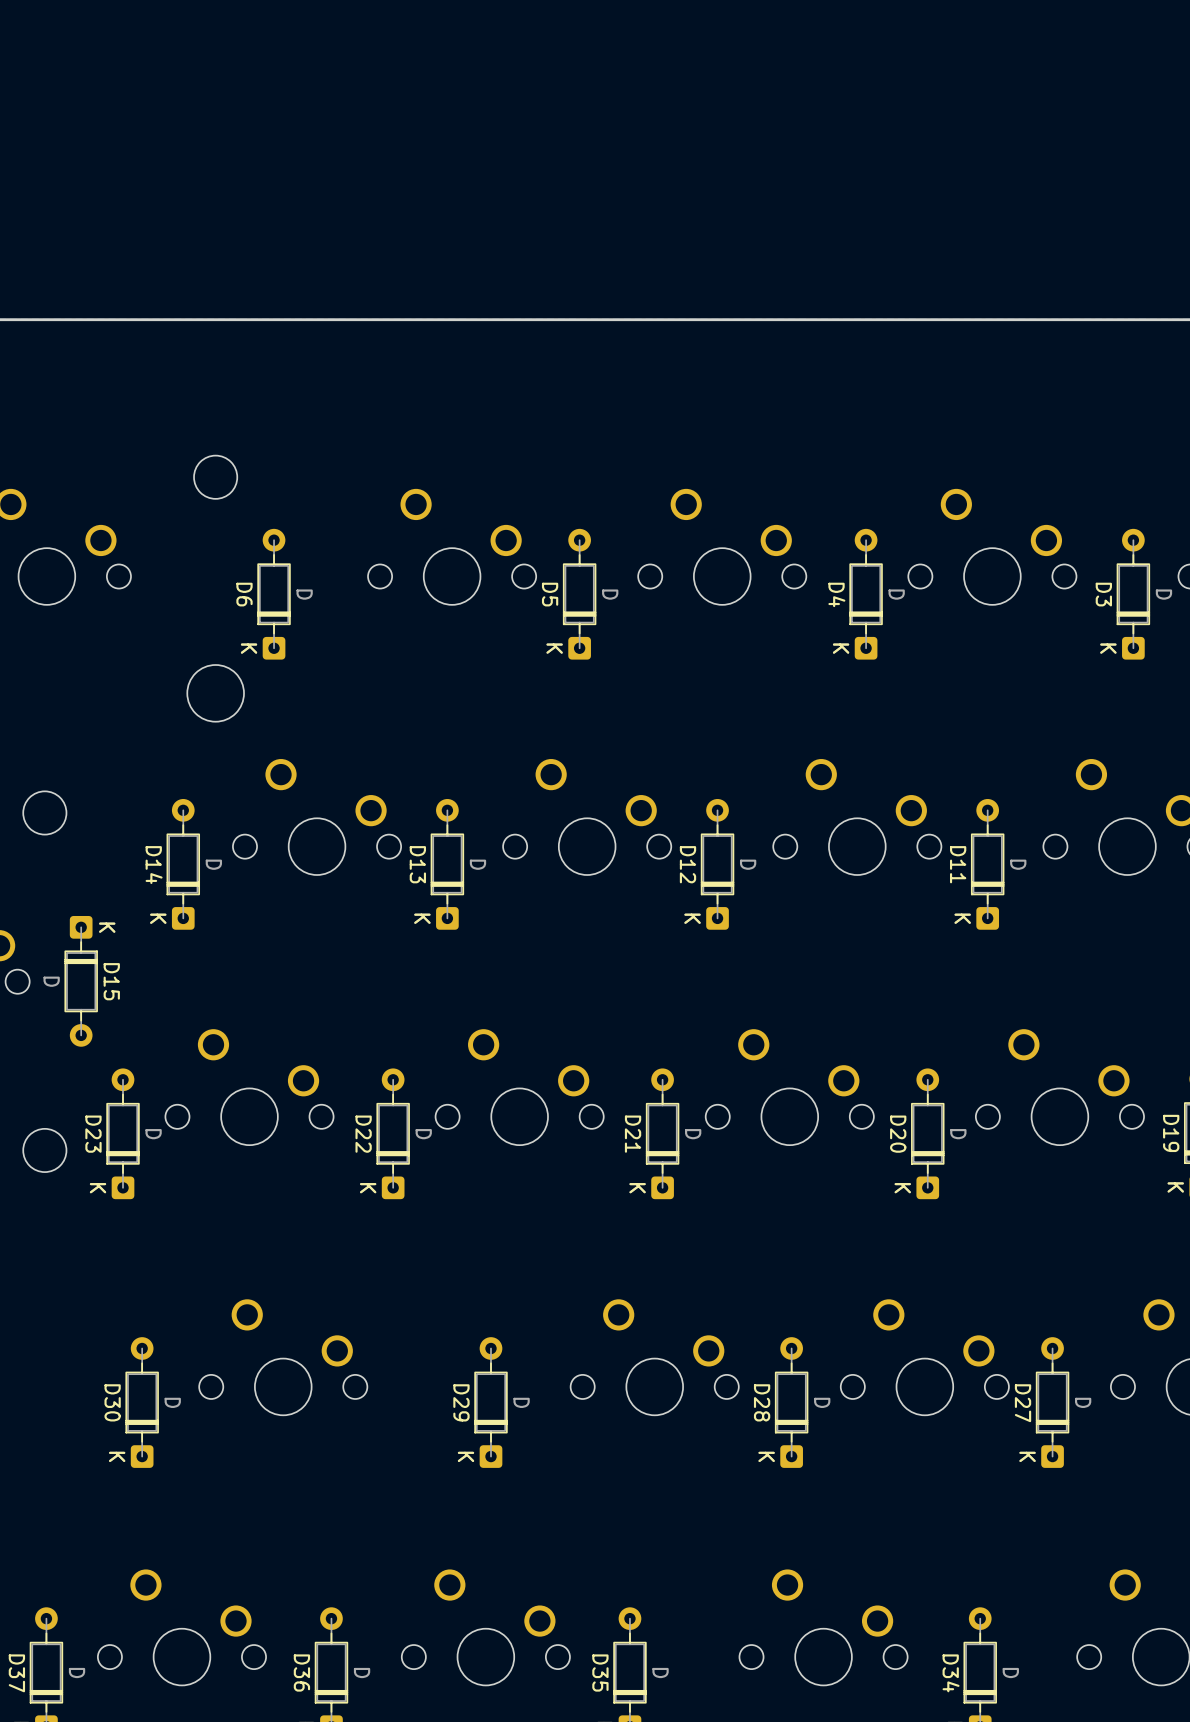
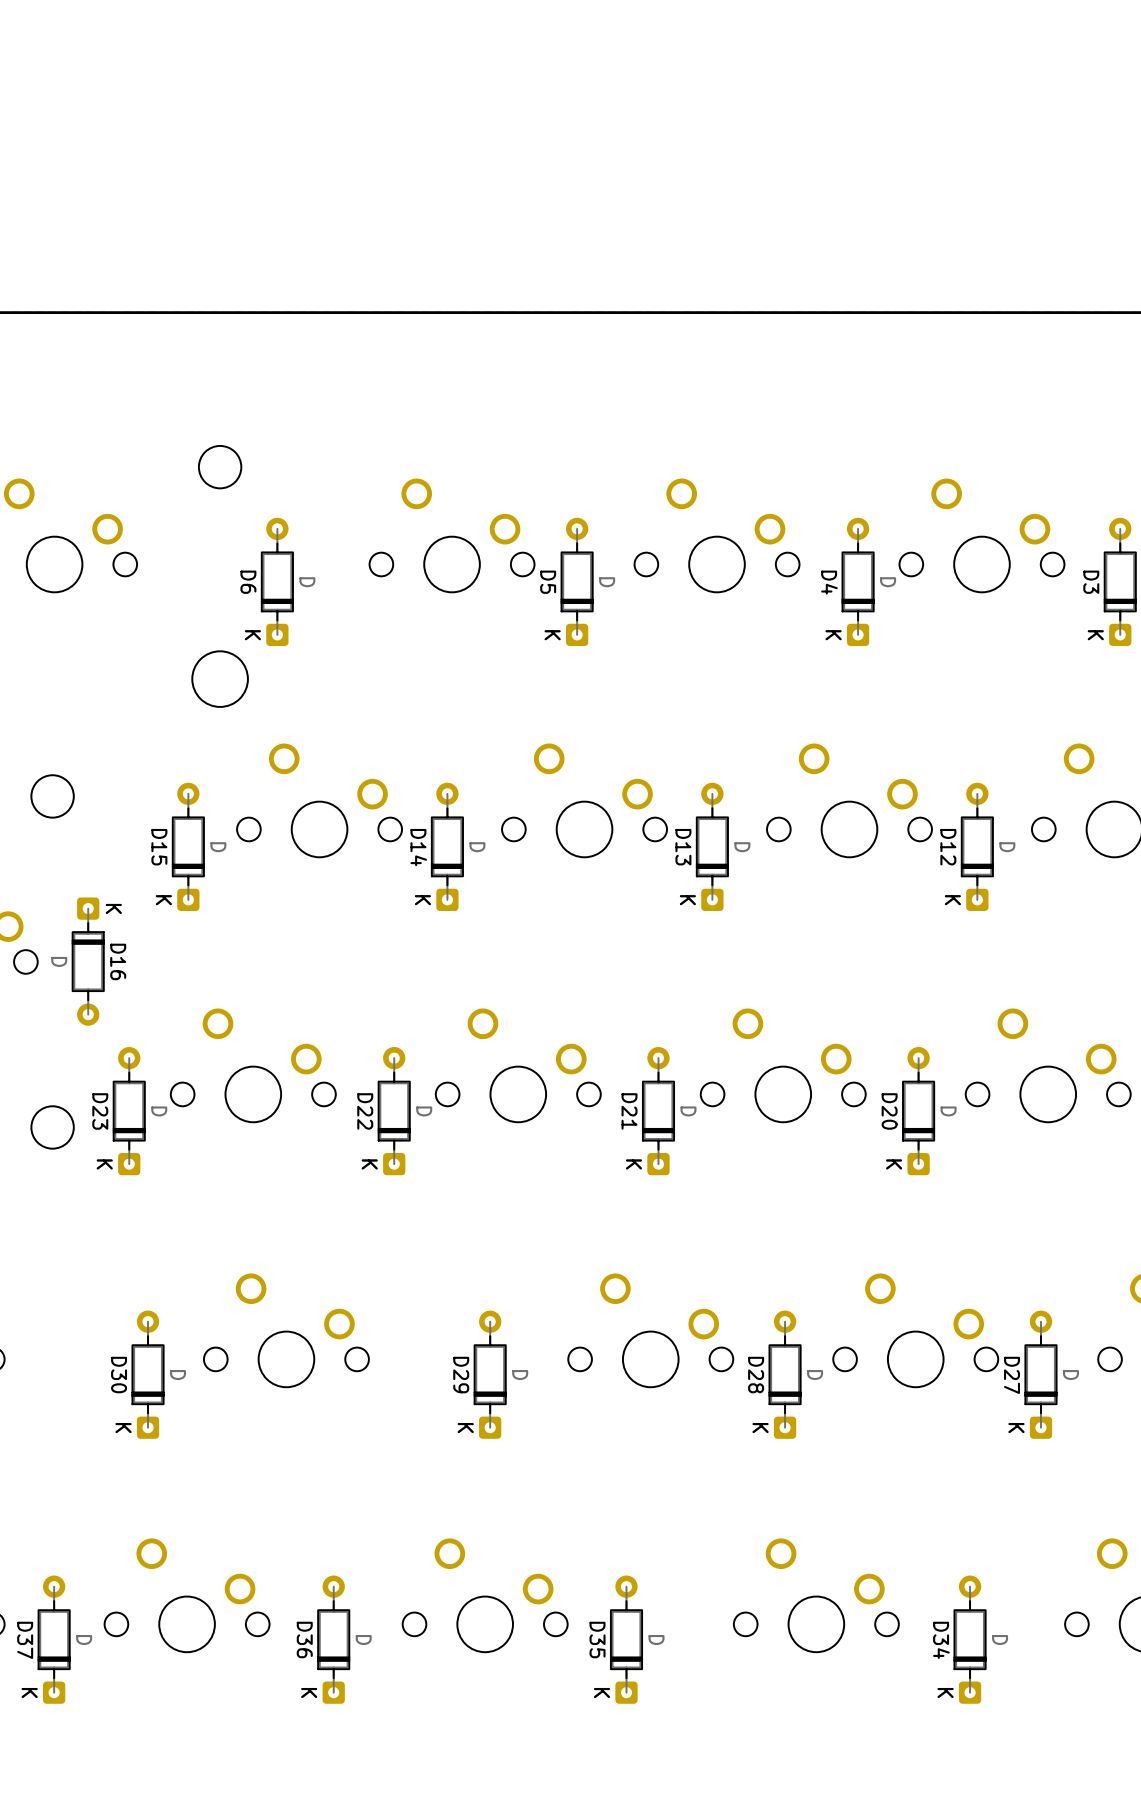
D13 name: D13 (417, 864) -> D14 (418, 847)
D12 name: D12 (688, 864) -> D13 (683, 847)
D11 name: D11 (958, 864) -> D12 (948, 847)
D14 name: D14 (154, 865) -> D15 (159, 847)
D15 name: D15 (111, 981) -> D16 (118, 961)

